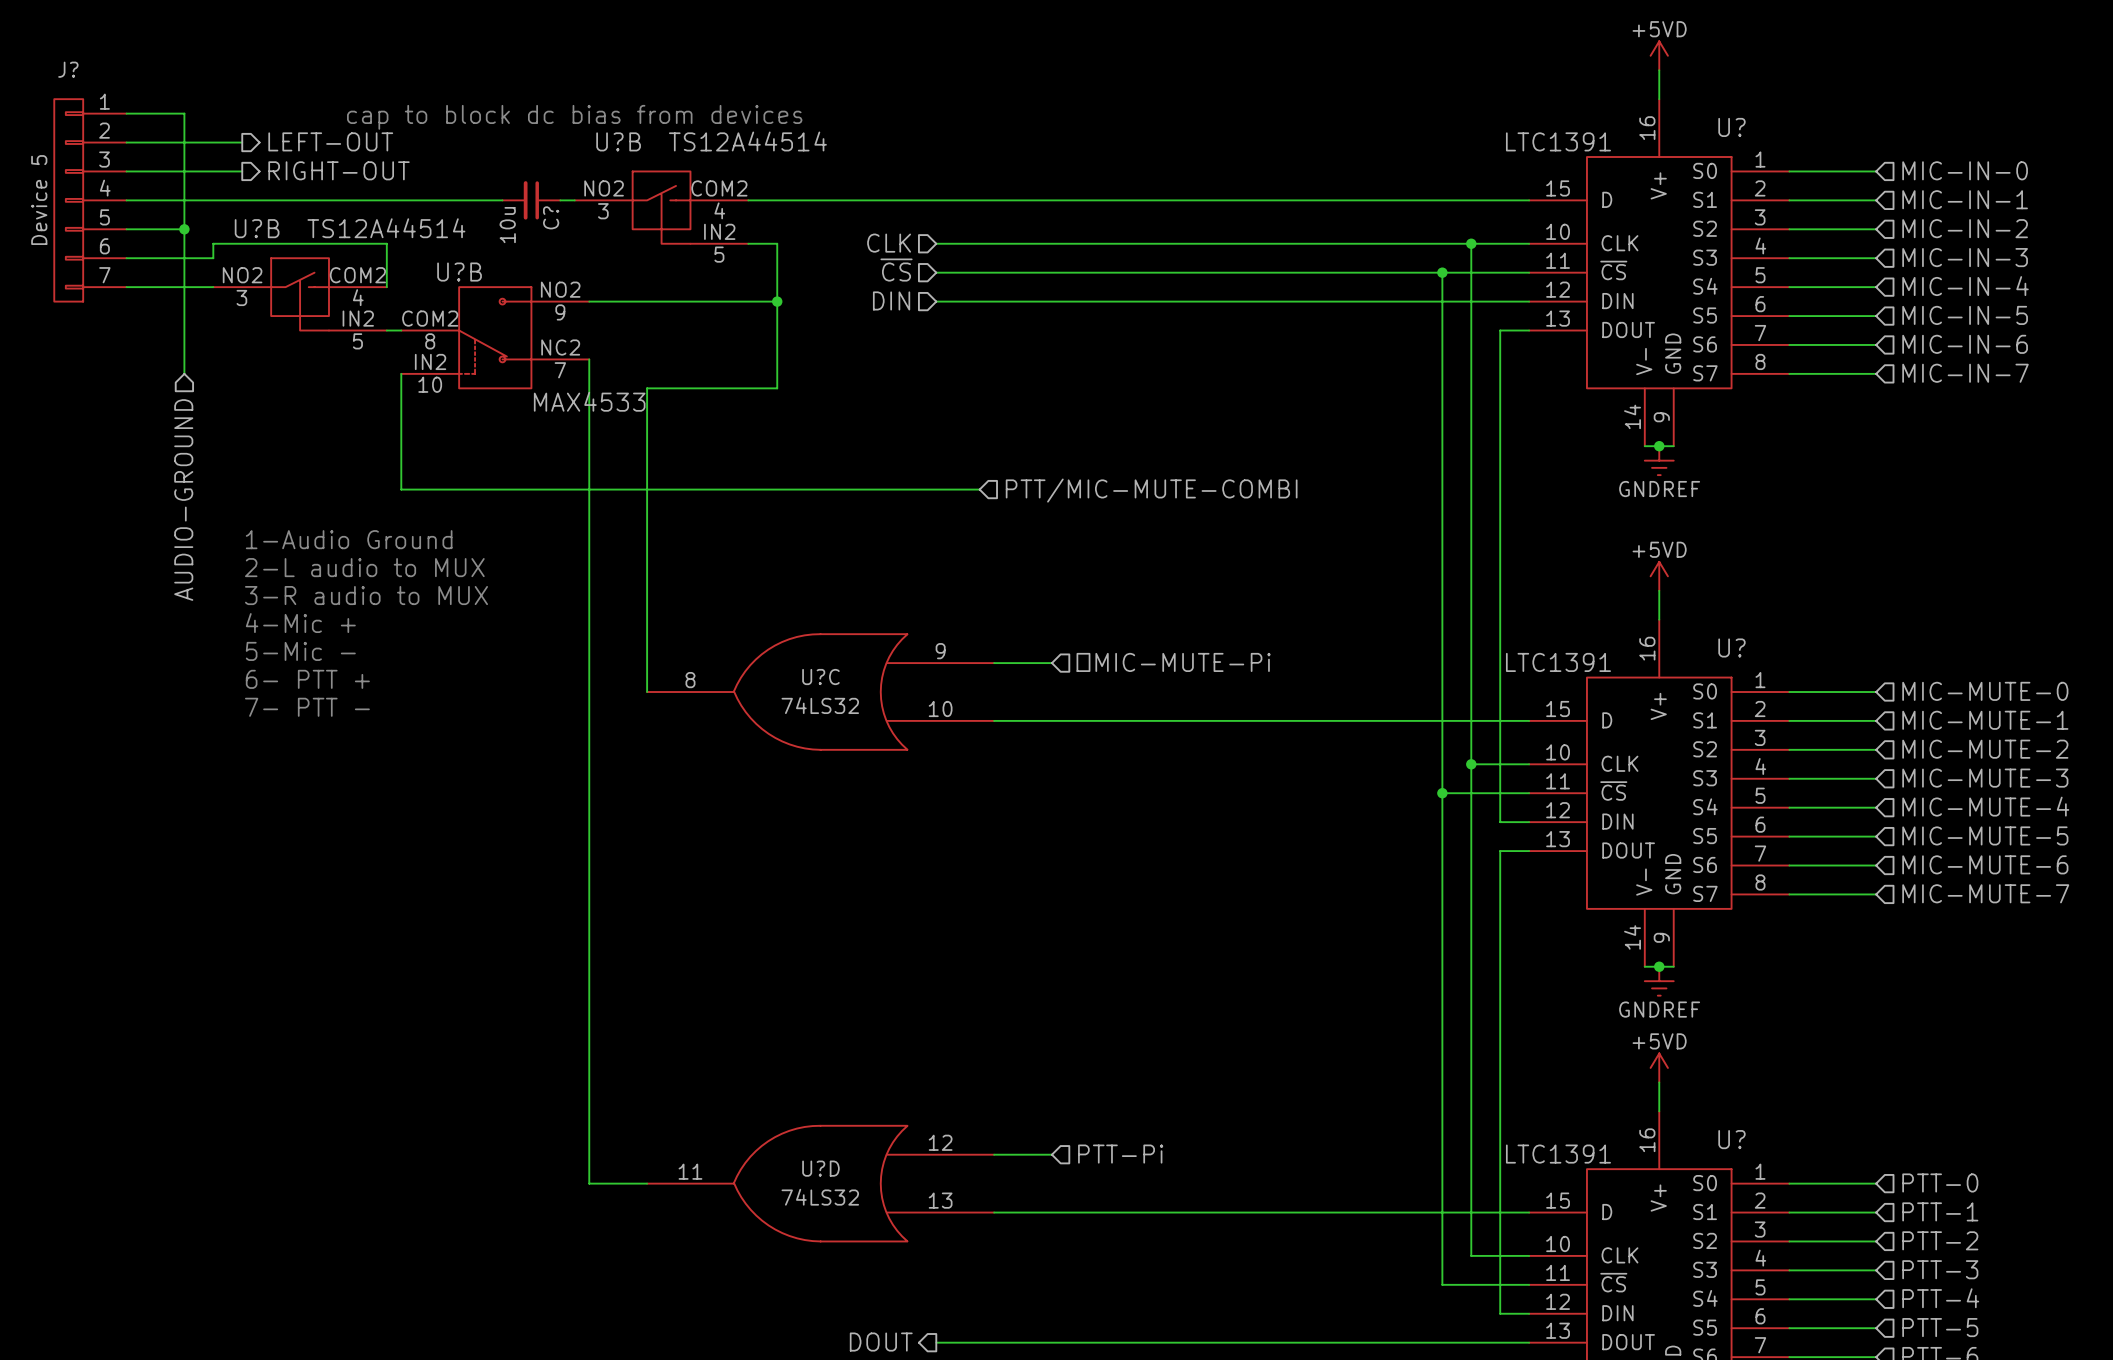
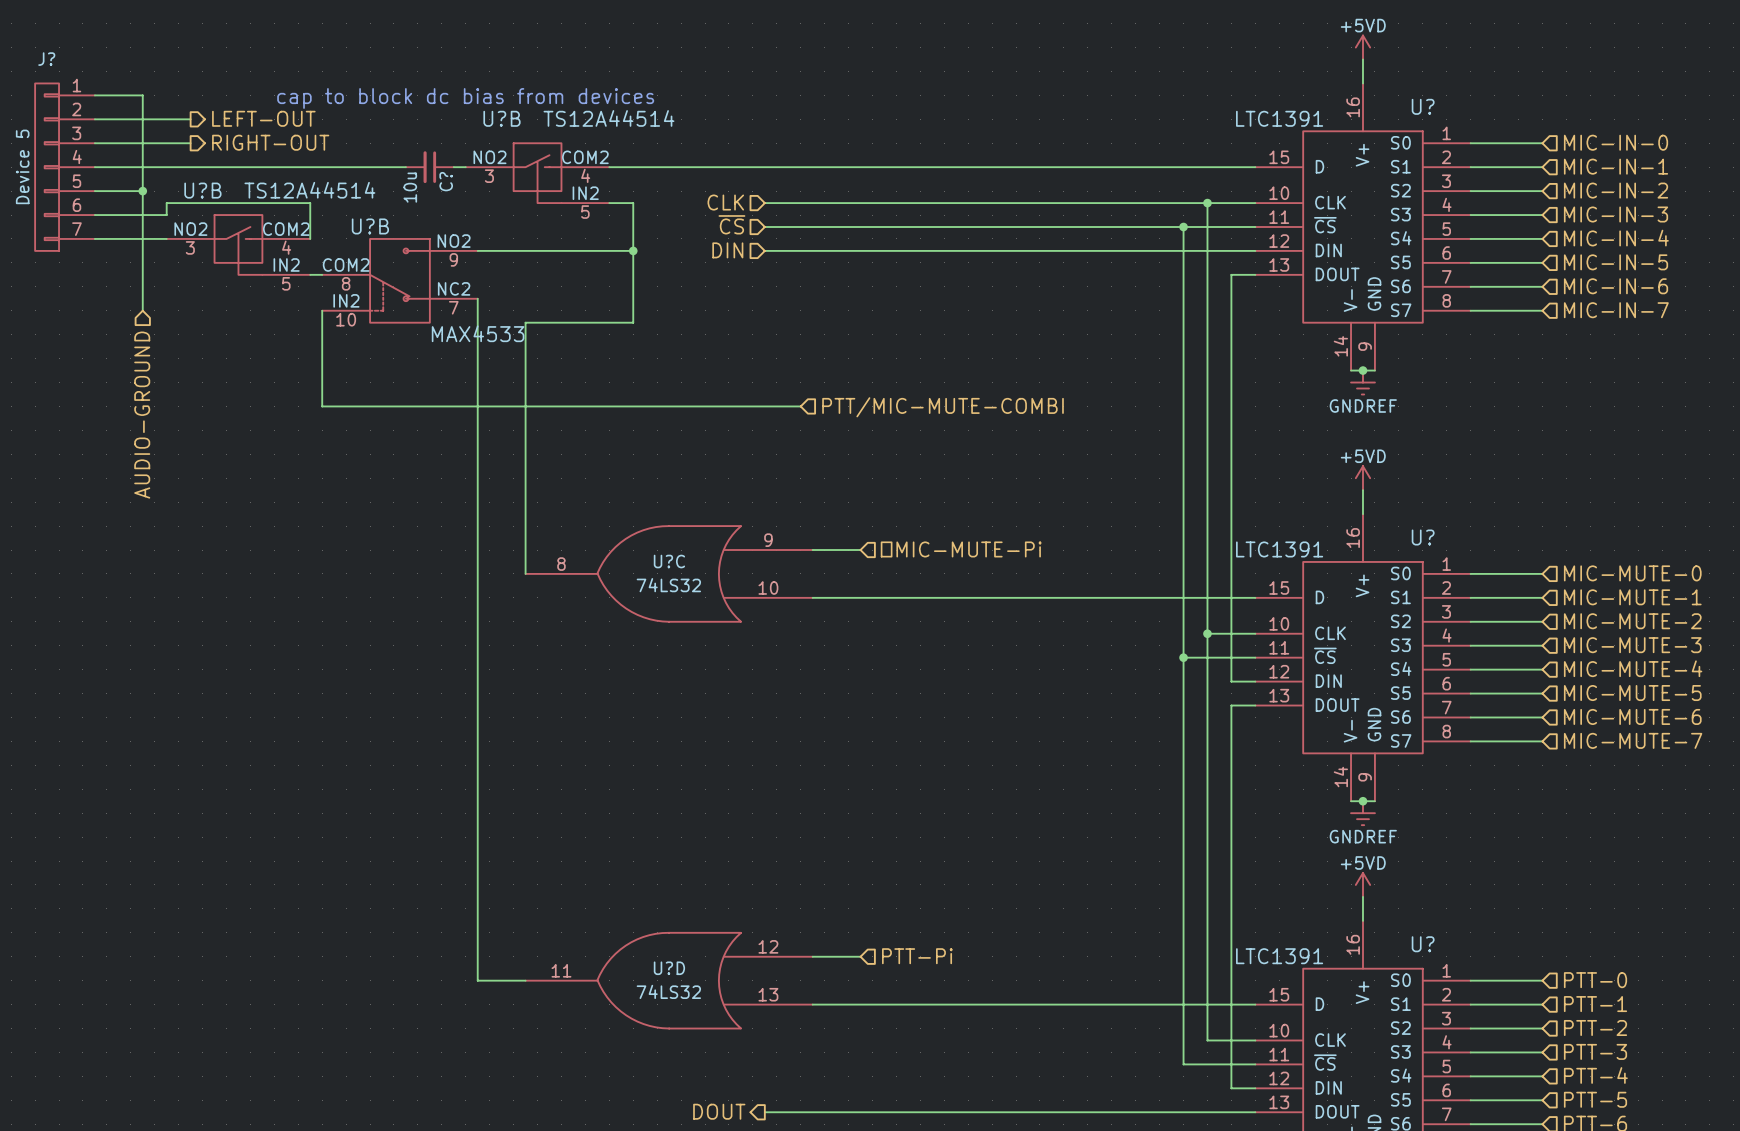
text: 1-Audio Ground (349, 539) -> none
text: 2-L audio to MUX (364, 567) -> none
text: 3-R audio to MUX (366, 595) -> none
text: 4-Mic + (300, 623) -> none
text: 5-Mic - (300, 651) -> none
text: 6- PTT + (307, 679) -> none
text: 7- PTT - (307, 707) -> none

